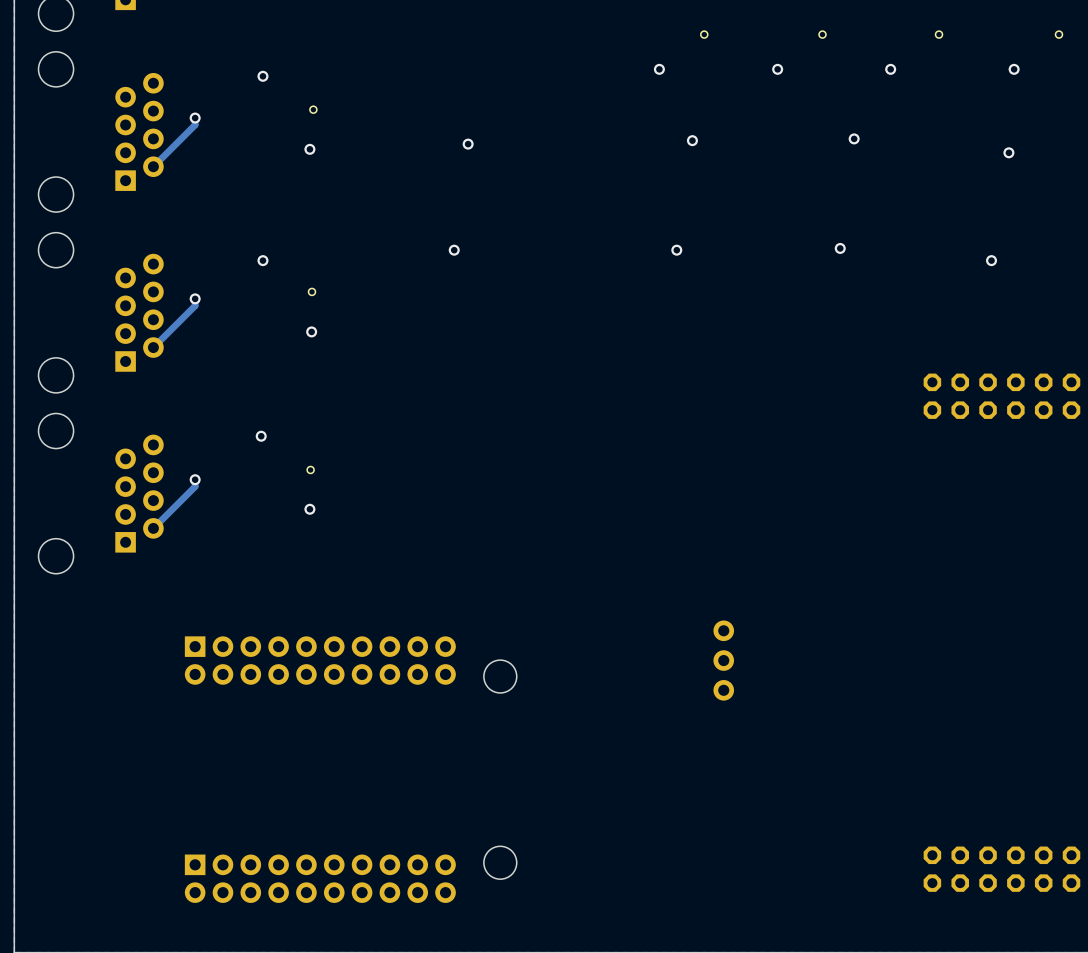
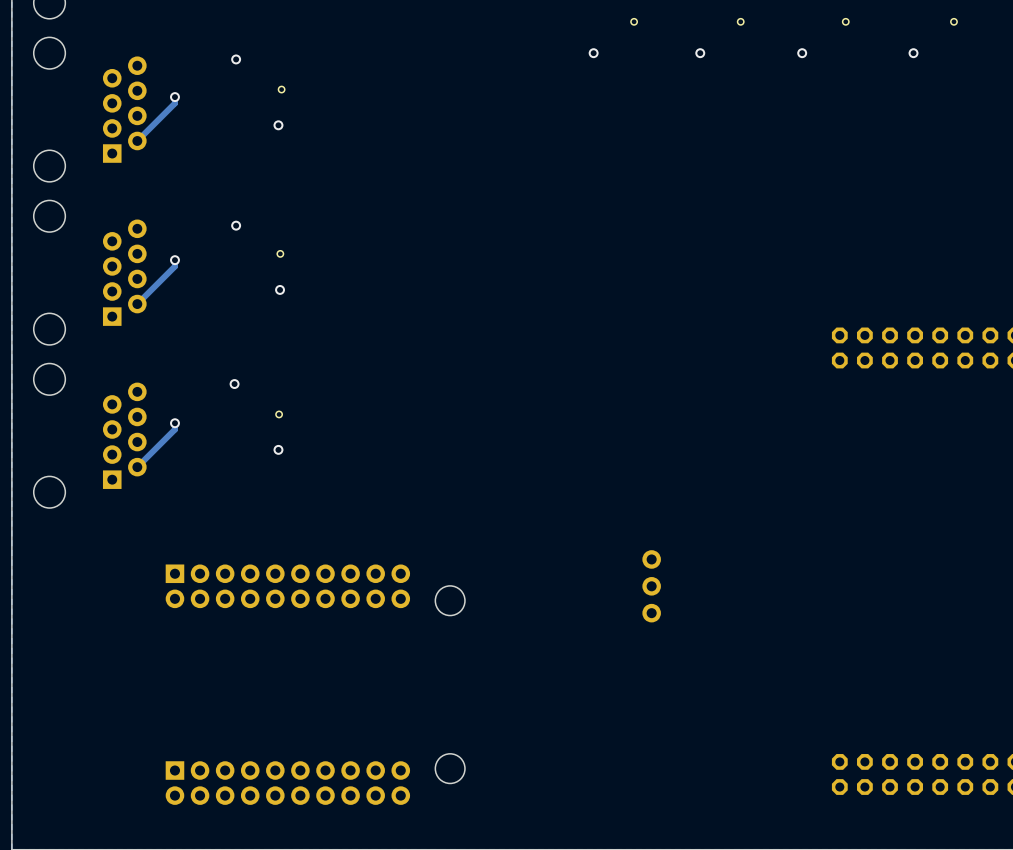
via: (854, 138) -> none
via: (692, 140) -> none
via: (468, 144) -> none
via: (1008, 152) -> none
via: (840, 248) -> none
via: (454, 250) -> none
via: (676, 250) -> none
via: (991, 260) -> none

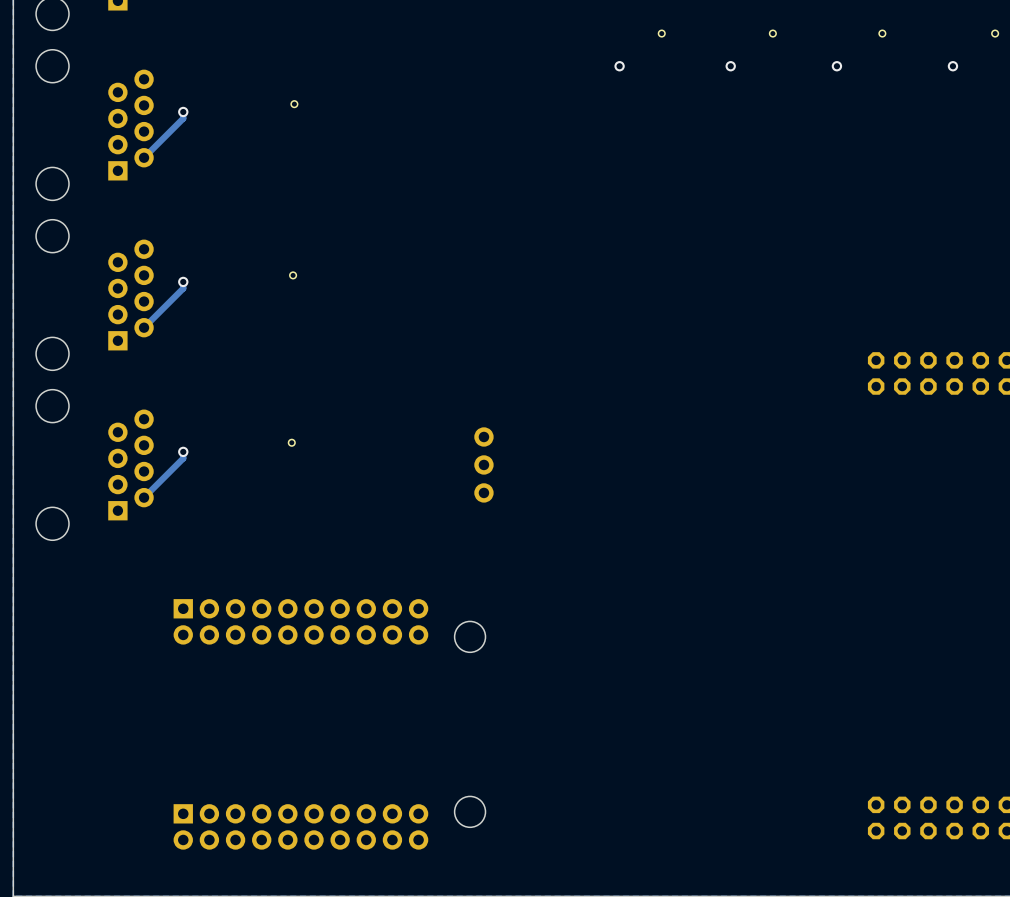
via: (236, 59) -> none
via: (278, 125) -> none
via: (236, 225) -> none
via: (280, 289) -> none
via: (234, 384) -> none
via: (278, 449) -> none
part position: (651, 586) -> (483, 464)

